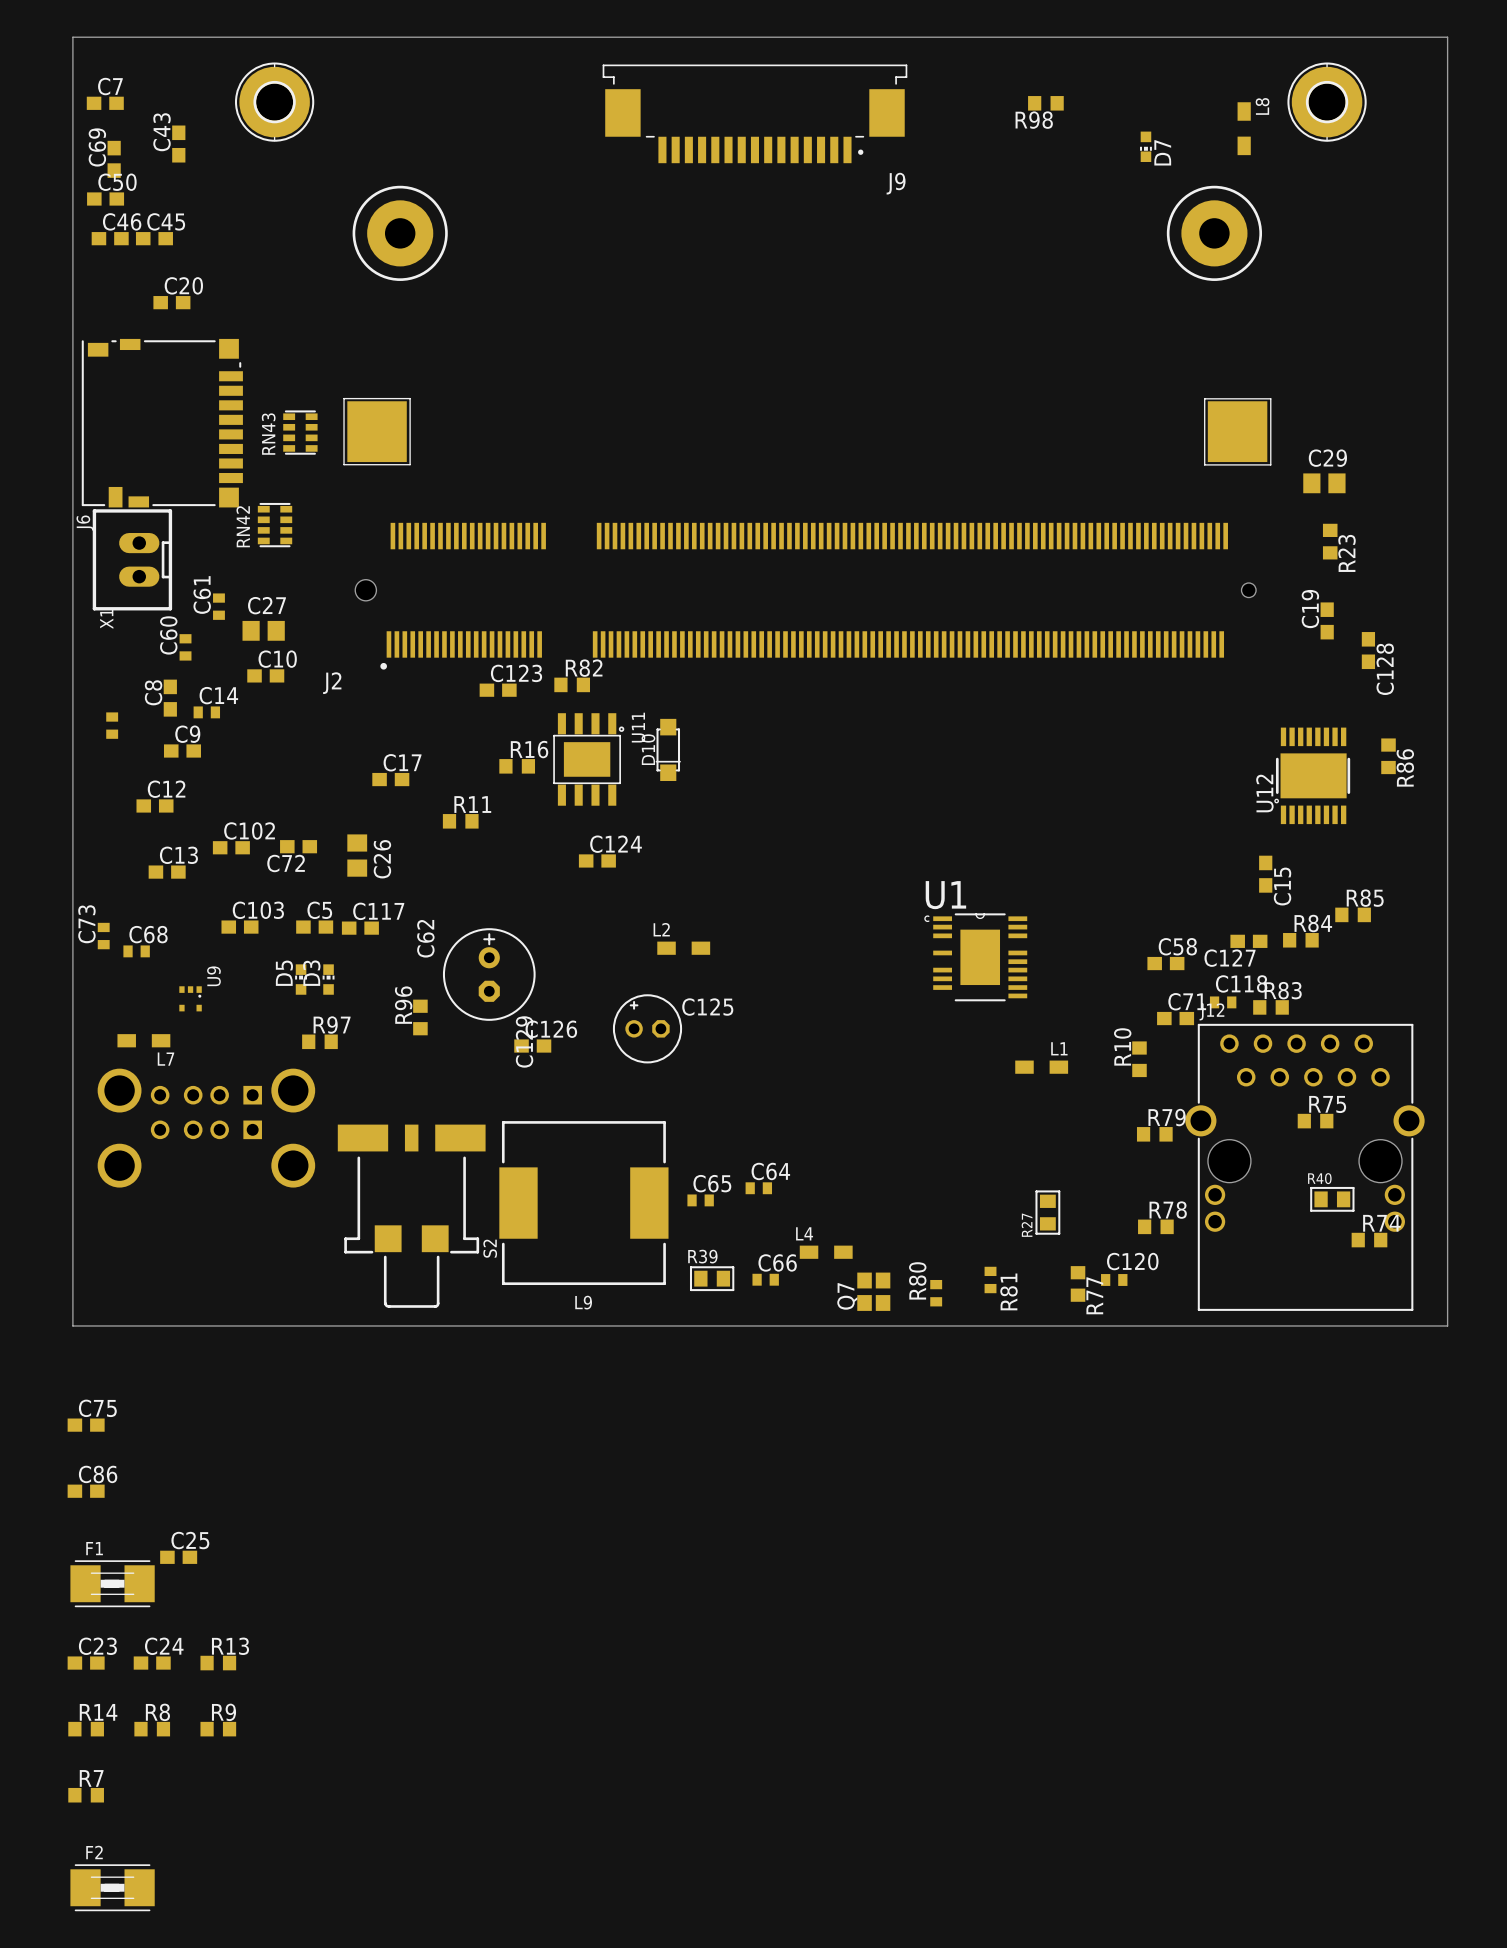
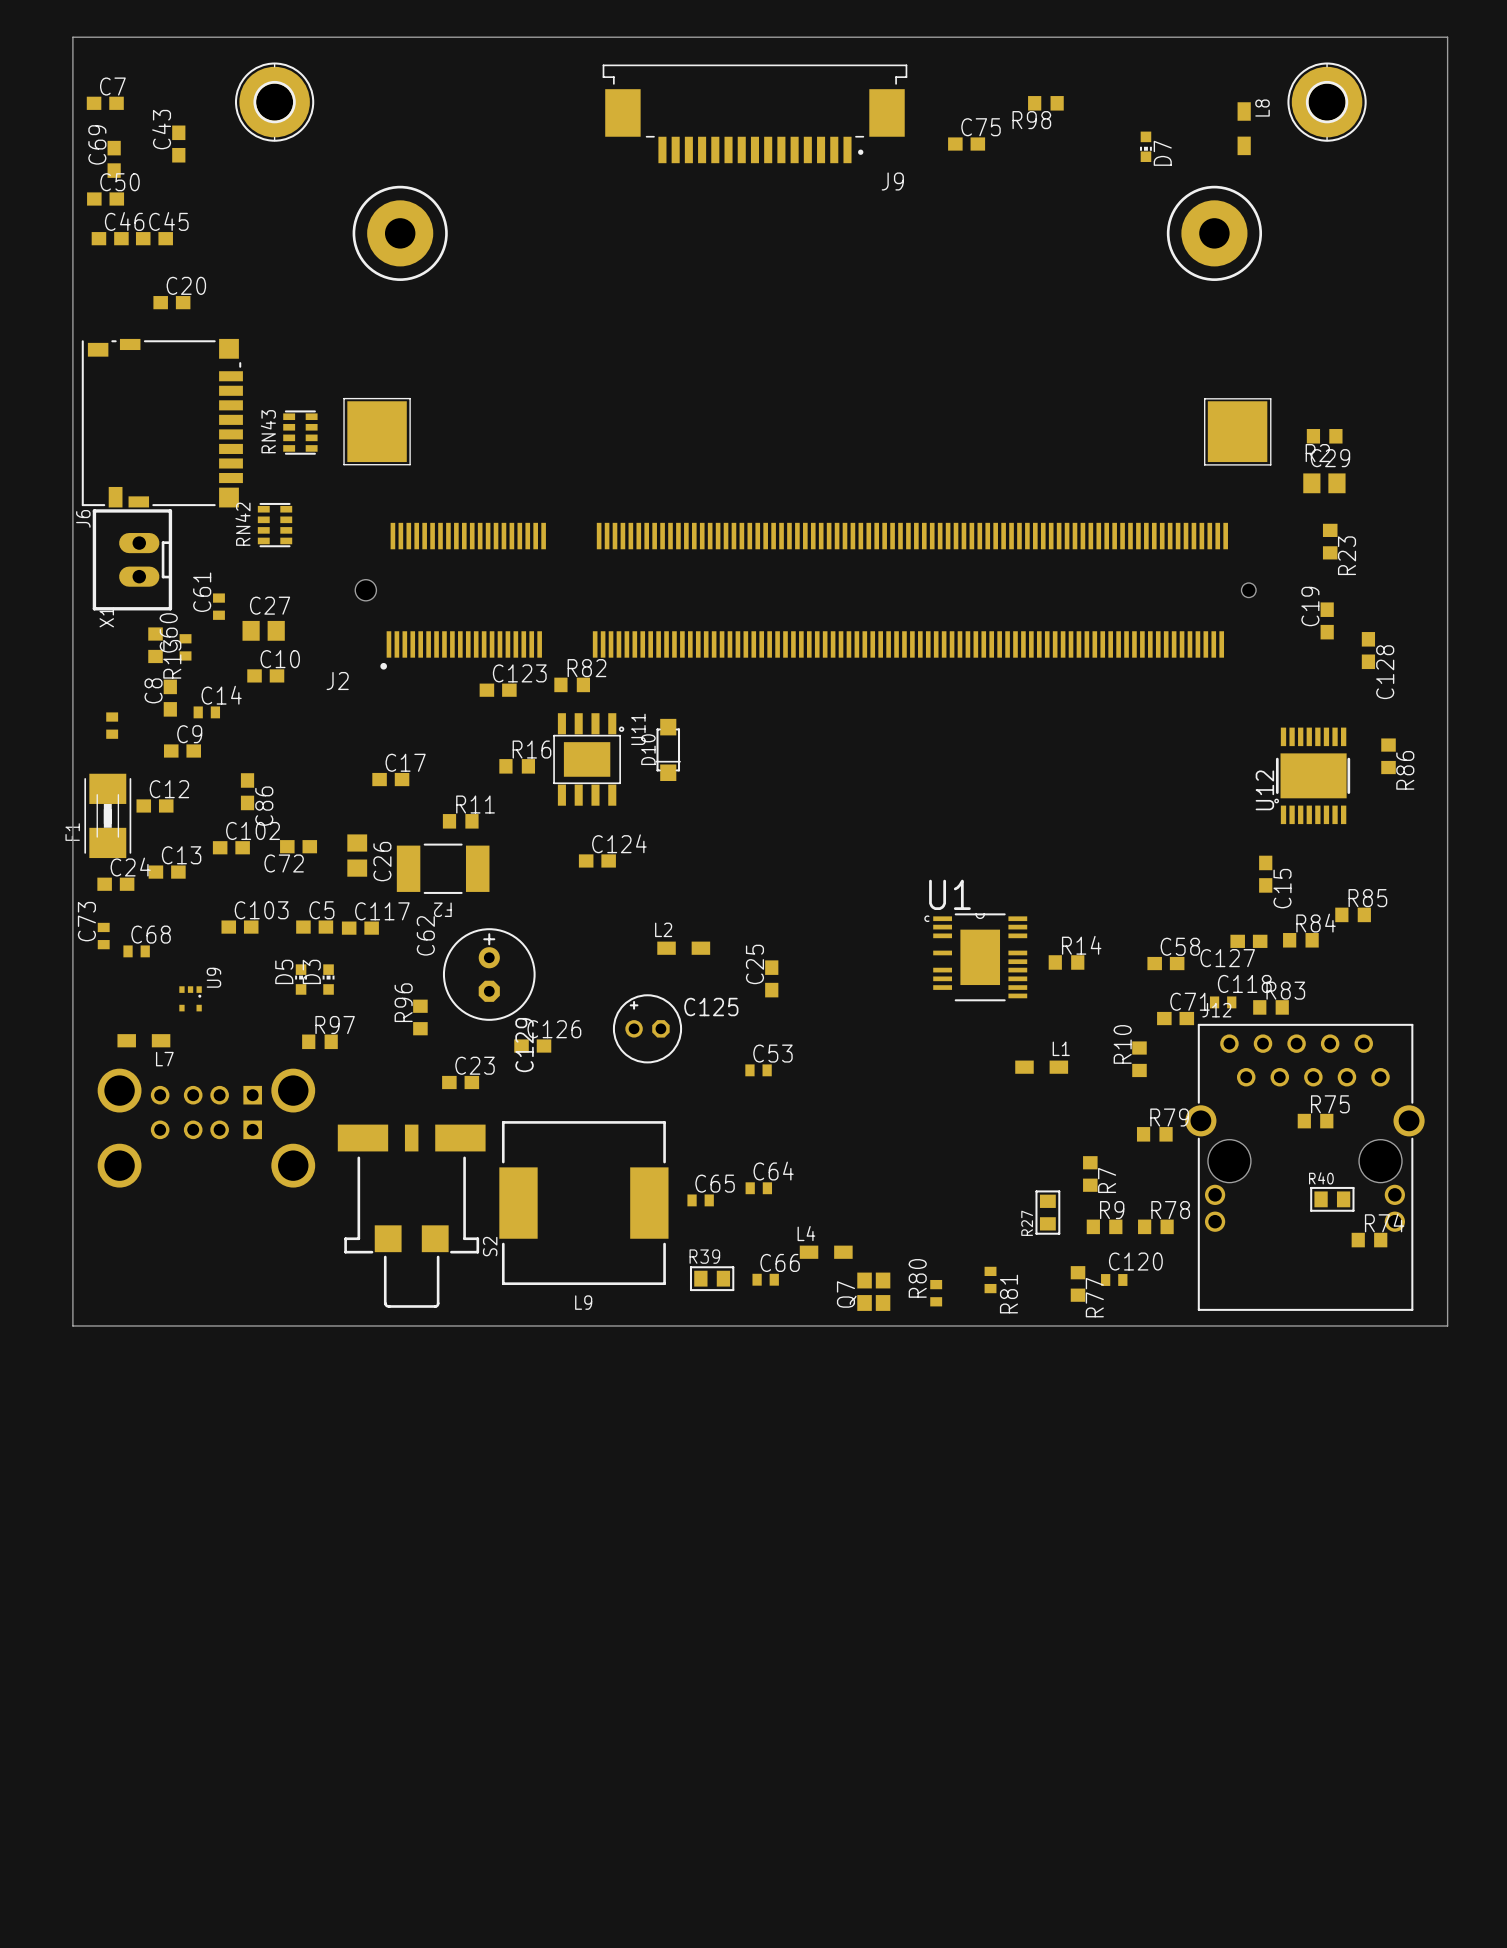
R2: none -> (1324, 436)
C53: none -> (758, 1070)
C75 position: (86, 1425) -> (966, 144)
C86 rotation: 0° (86, 1491) -> 90° clockwise (247, 791)
C86 position: (86, 1491) -> (247, 791)
C25 name position: C25 (190, 1540) -> C25 (754, 964)
C25 rotation: 0° (178, 1557) -> 90° clockwise (771, 978)
C25 position: (178, 1557) -> (771, 978)
F1 rotation: 0° (112, 1583) -> 90° counterclockwise (107, 815)
F1 position: (112, 1583) -> (107, 815)
C23 position: (86, 1663) -> (460, 1082)
C24 position: (152, 1663) -> (115, 884)
R13 rotation: 0° (218, 1663) -> 90° clockwise (155, 645)
R13 position: (218, 1663) -> (155, 645)
R14 position: (86, 1729) -> (1066, 962)
R8: (152, 1729) -> none
R9 position: (218, 1729) -> (1104, 1226)
R7 rotation: 0° (86, 1795) -> 90° clockwise (1090, 1173)
R7 position: (86, 1795) -> (1090, 1173)
F2 name position: F2 (94, 1852) -> F2 (442, 909)
F2 footprint: [70, 1864, 155, 1912] -> [396, 843, 490, 894]

